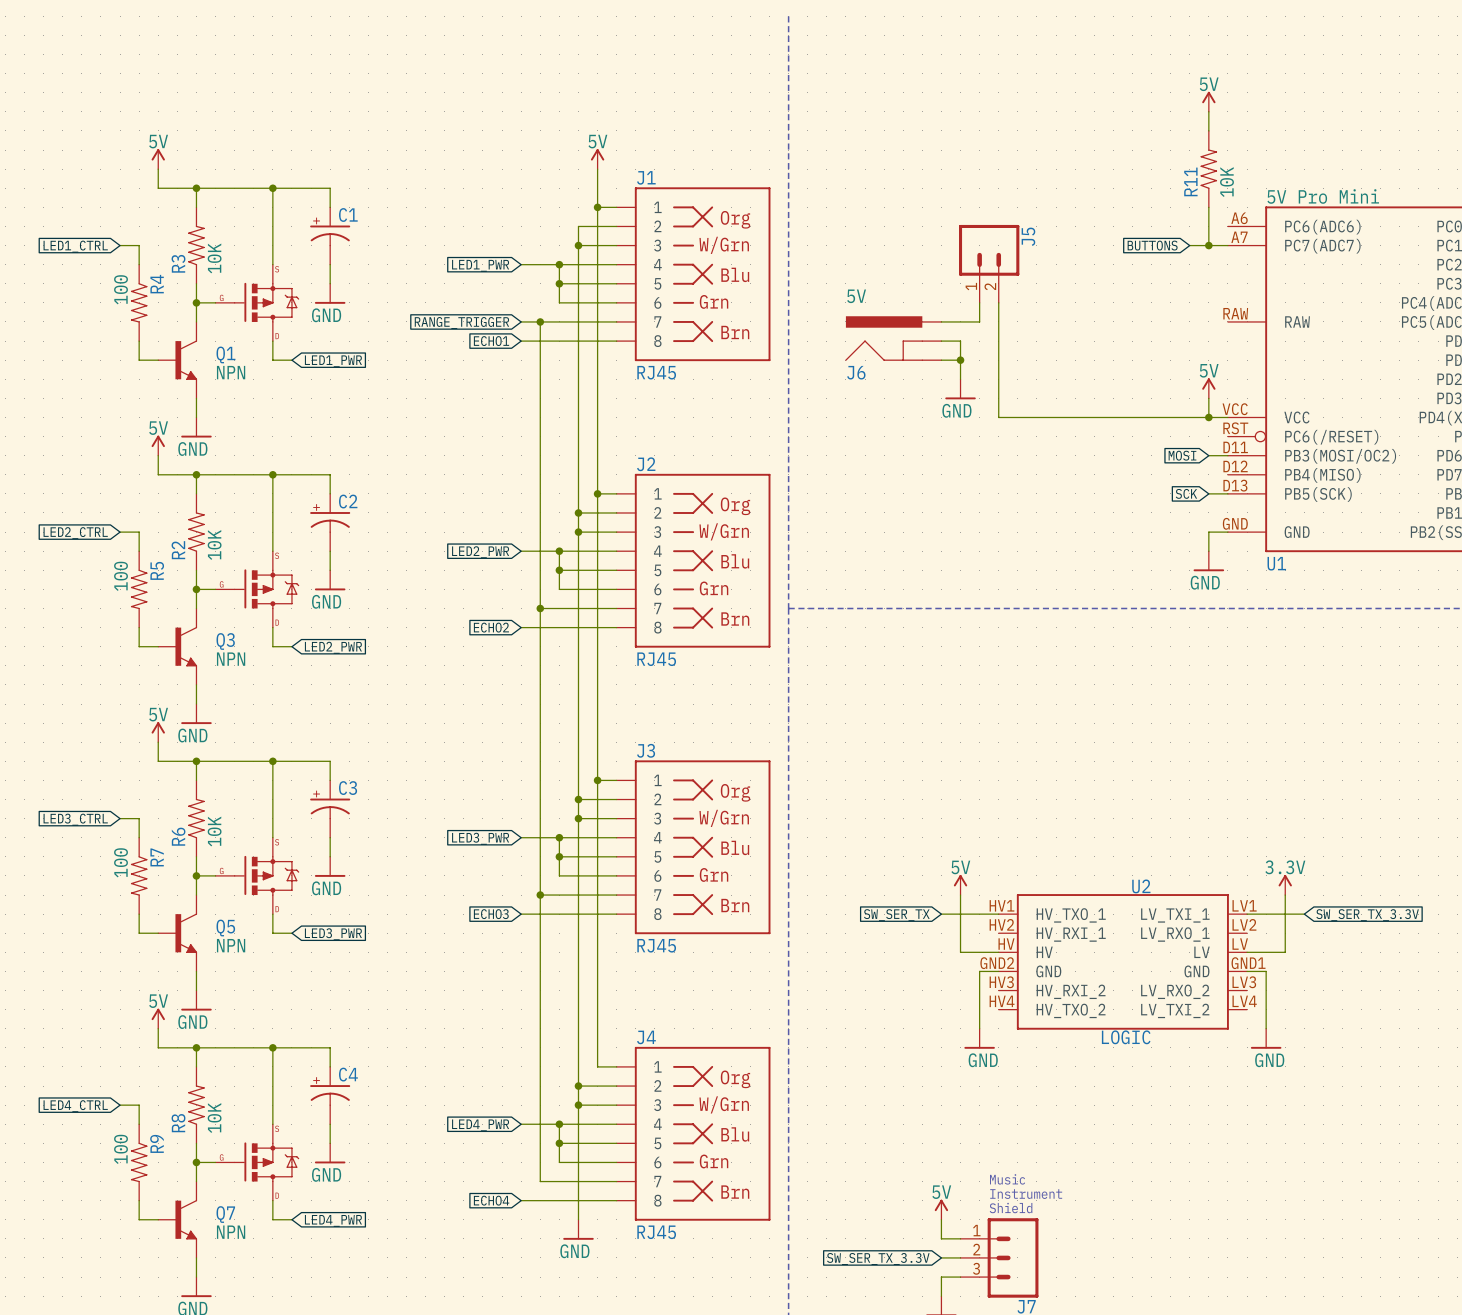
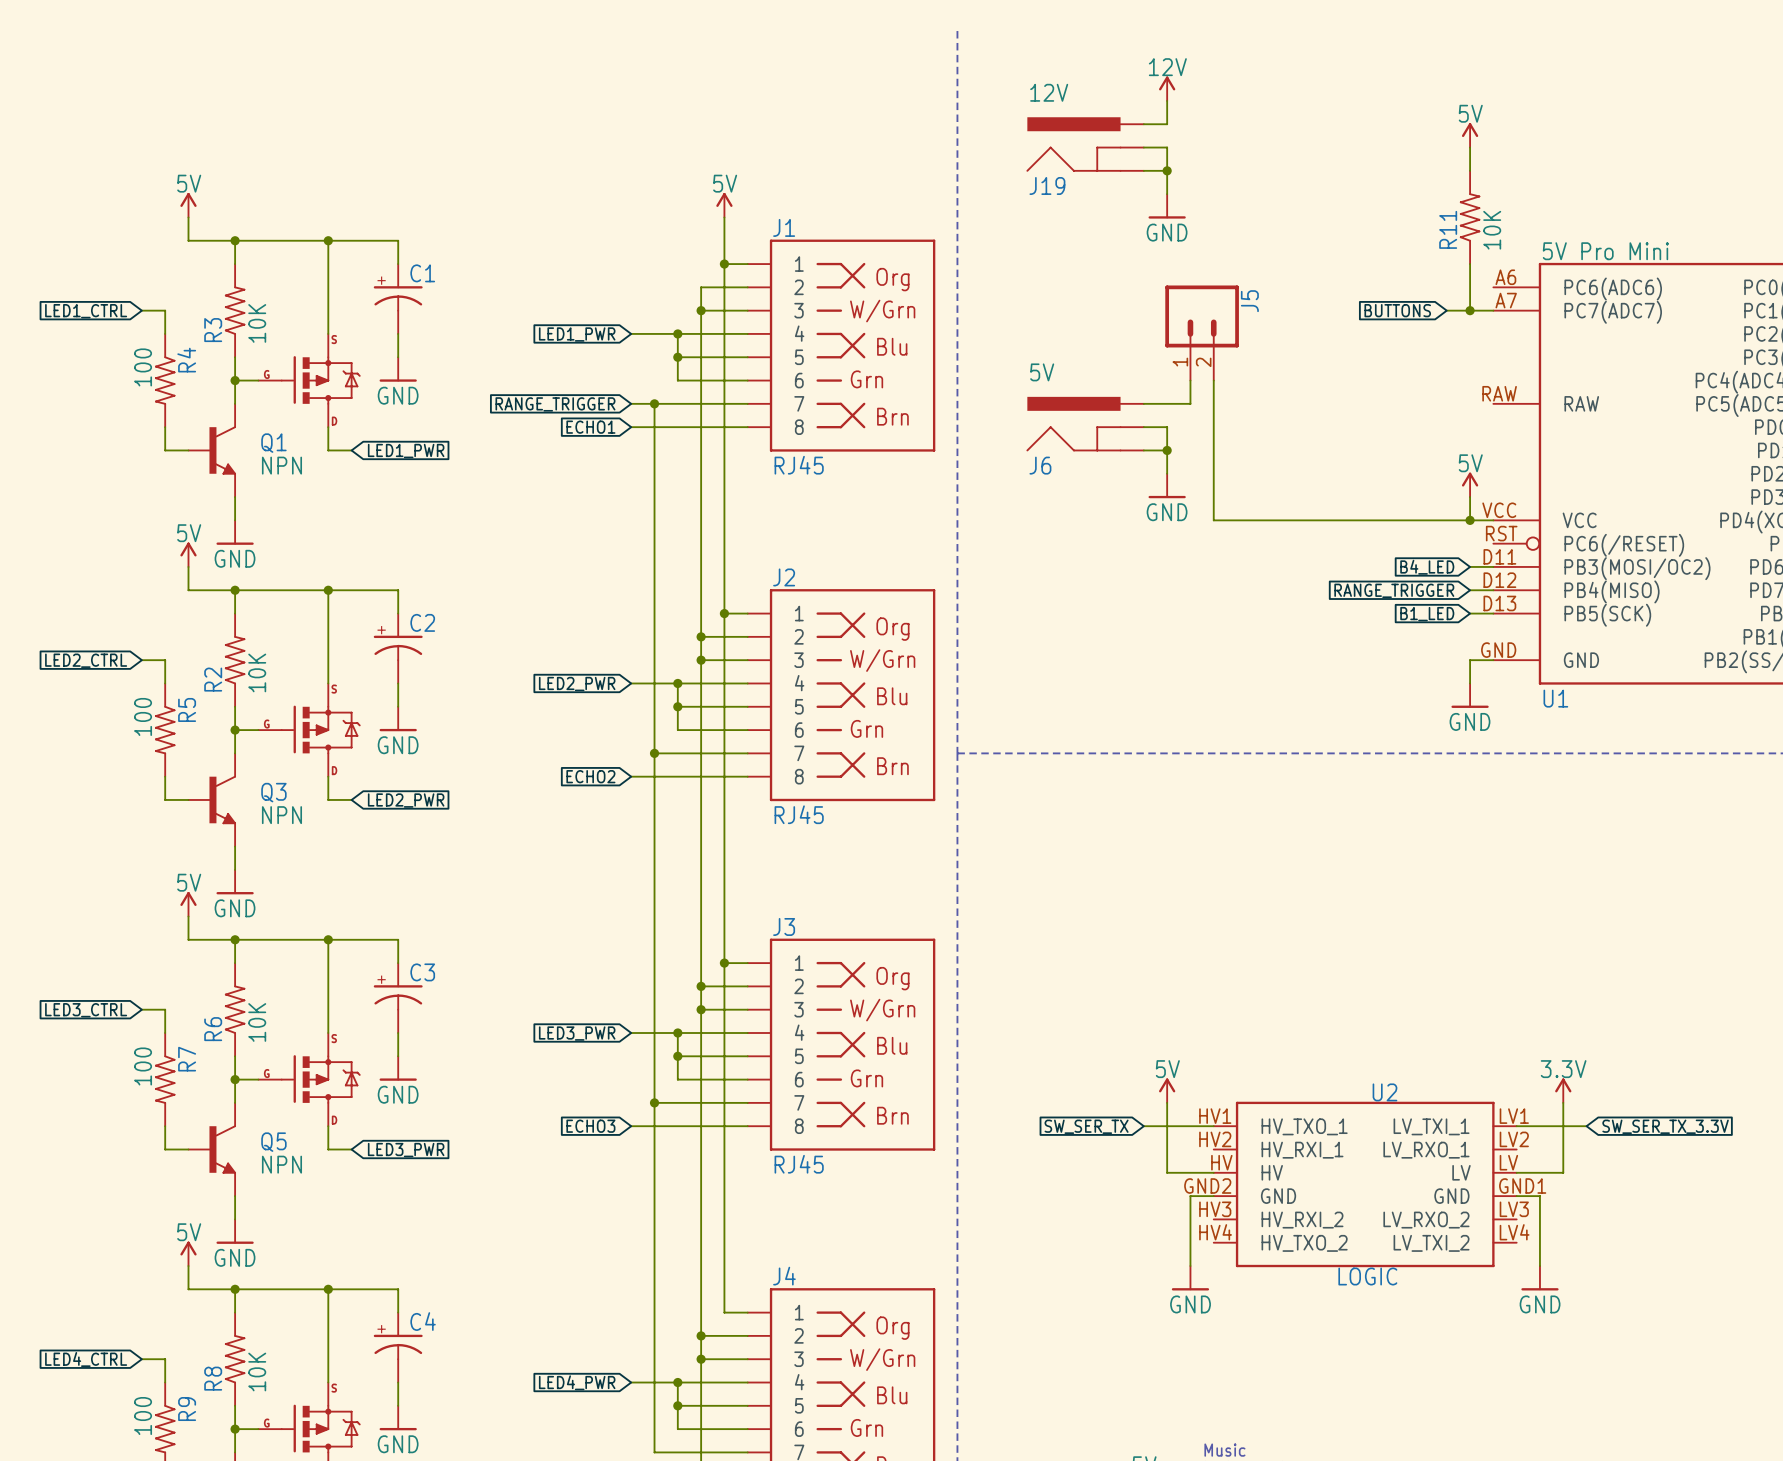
power symbol: none -> 12V (1167, 88)
wire: none -> (1167, 100) (1167, 124) (1143, 124)
J19: none -> 12V (1085, 144)
wire: none -> (1143, 147) (1167, 147) (1167, 194)
wire: none -> (1143, 170) (1167, 170)
junction: none -> (1167, 170)
power symbol: none -> GND (1167, 206)
global label: MOSI (1182, 455) -> B4_LED (1427, 567)
wire: none -> (1470, 590) (1493, 590)
global label: none -> RANGE_TRIGGER (1394, 590)
global label: SCK (1186, 493) -> B1_LED (1427, 614)

